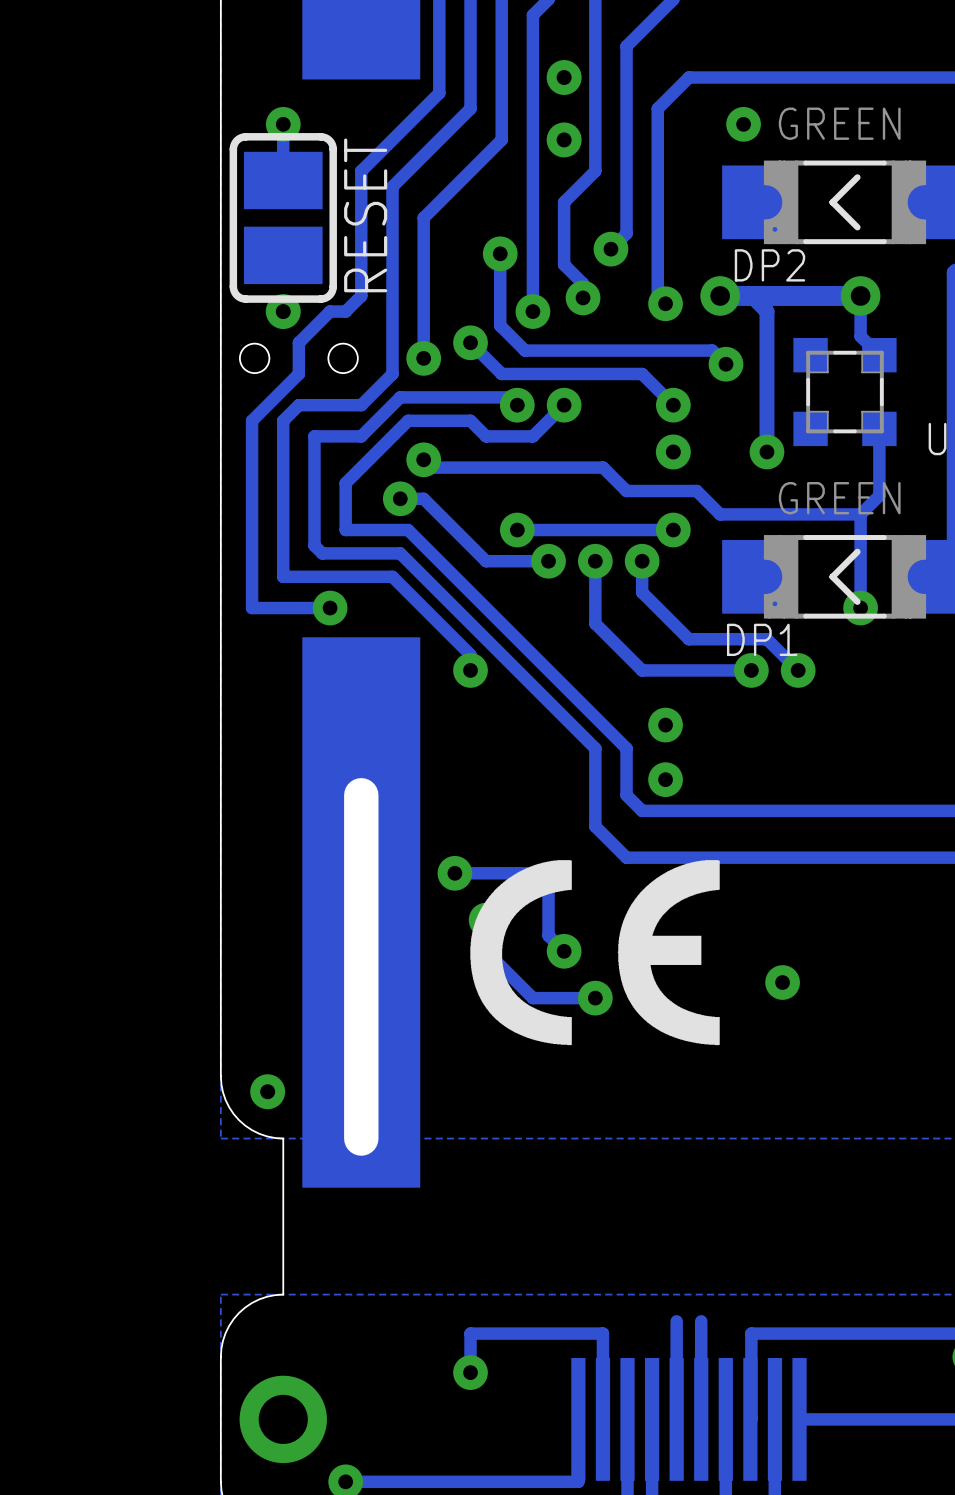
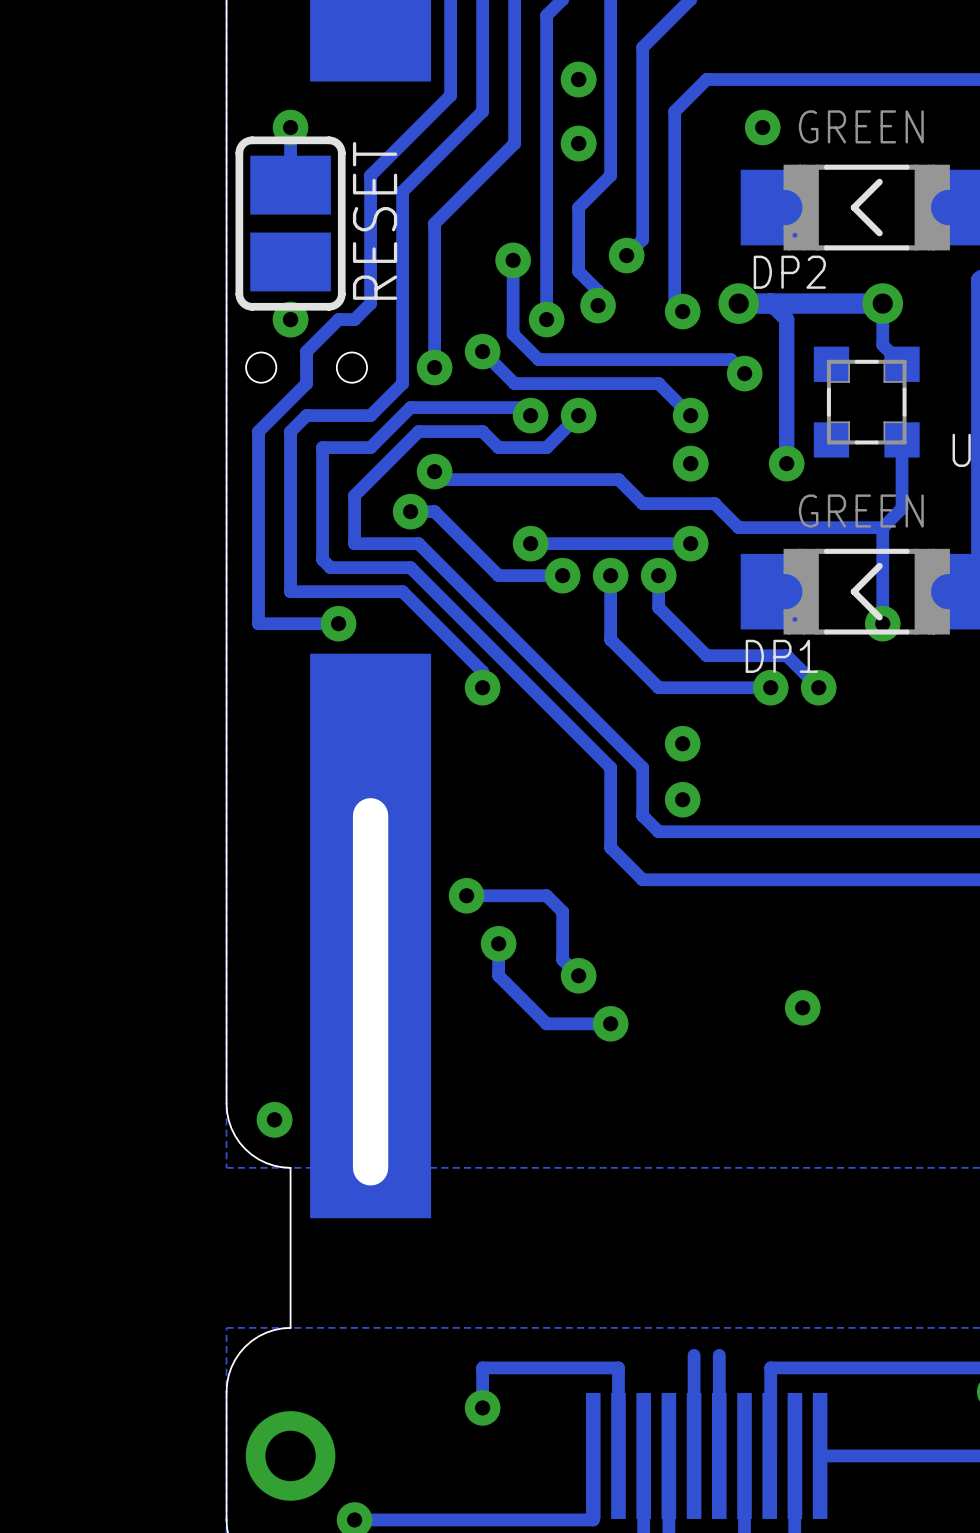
drawing: [470, 860, 720, 1046] -> none

